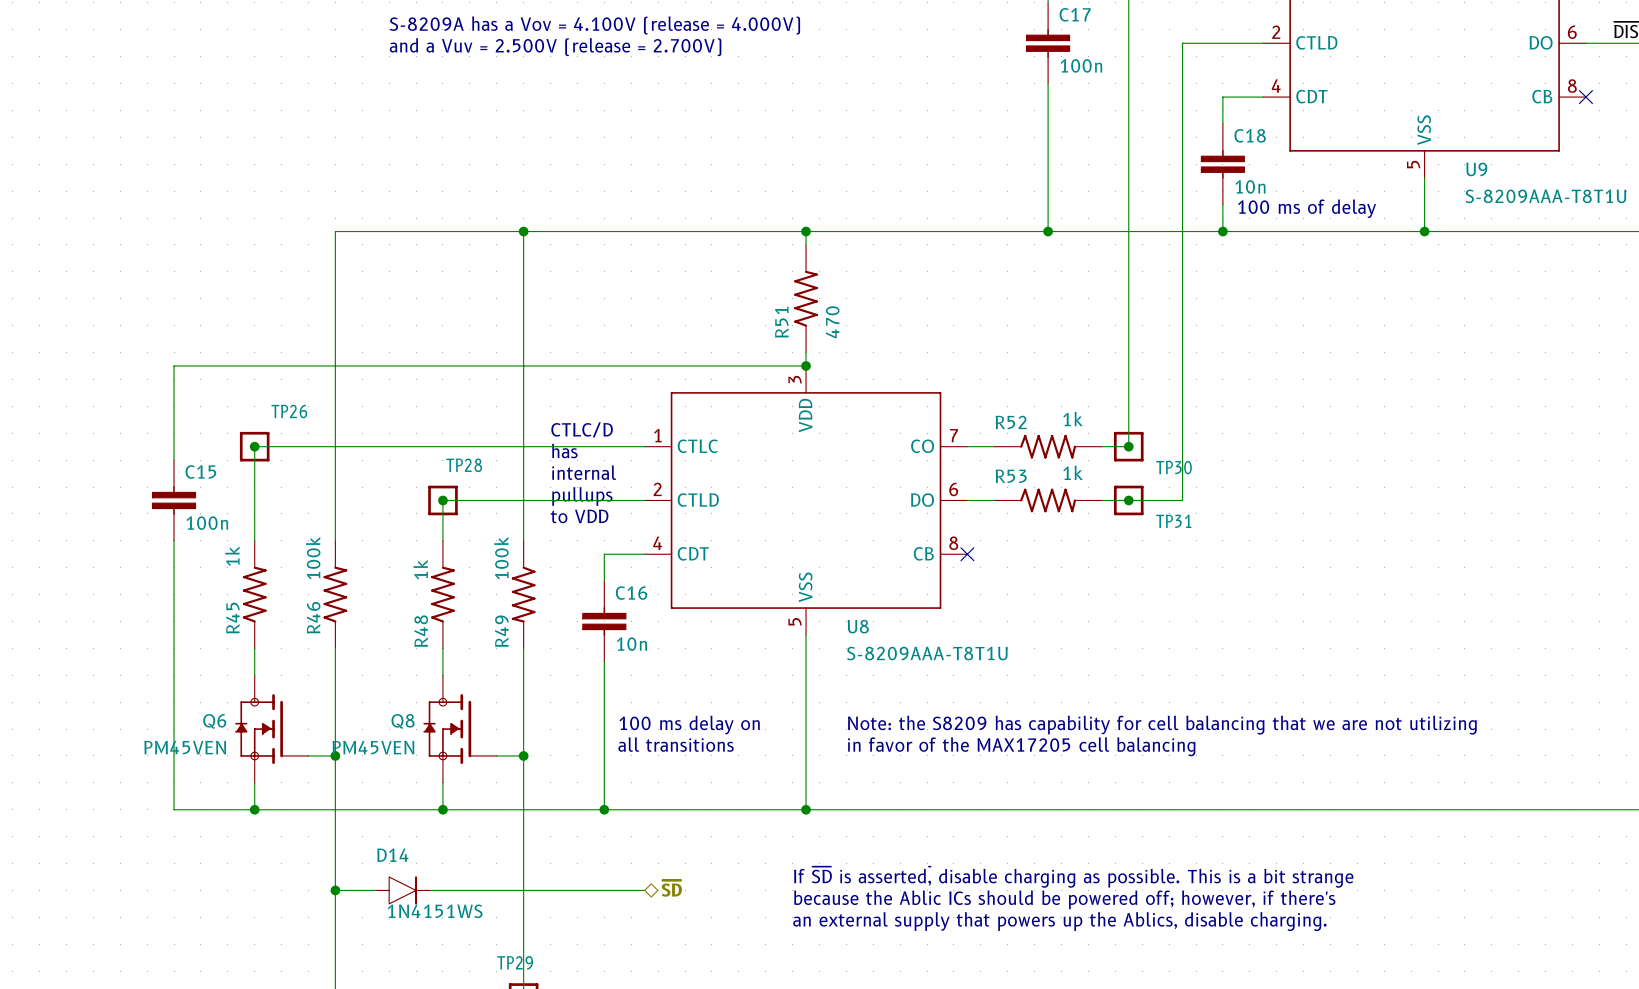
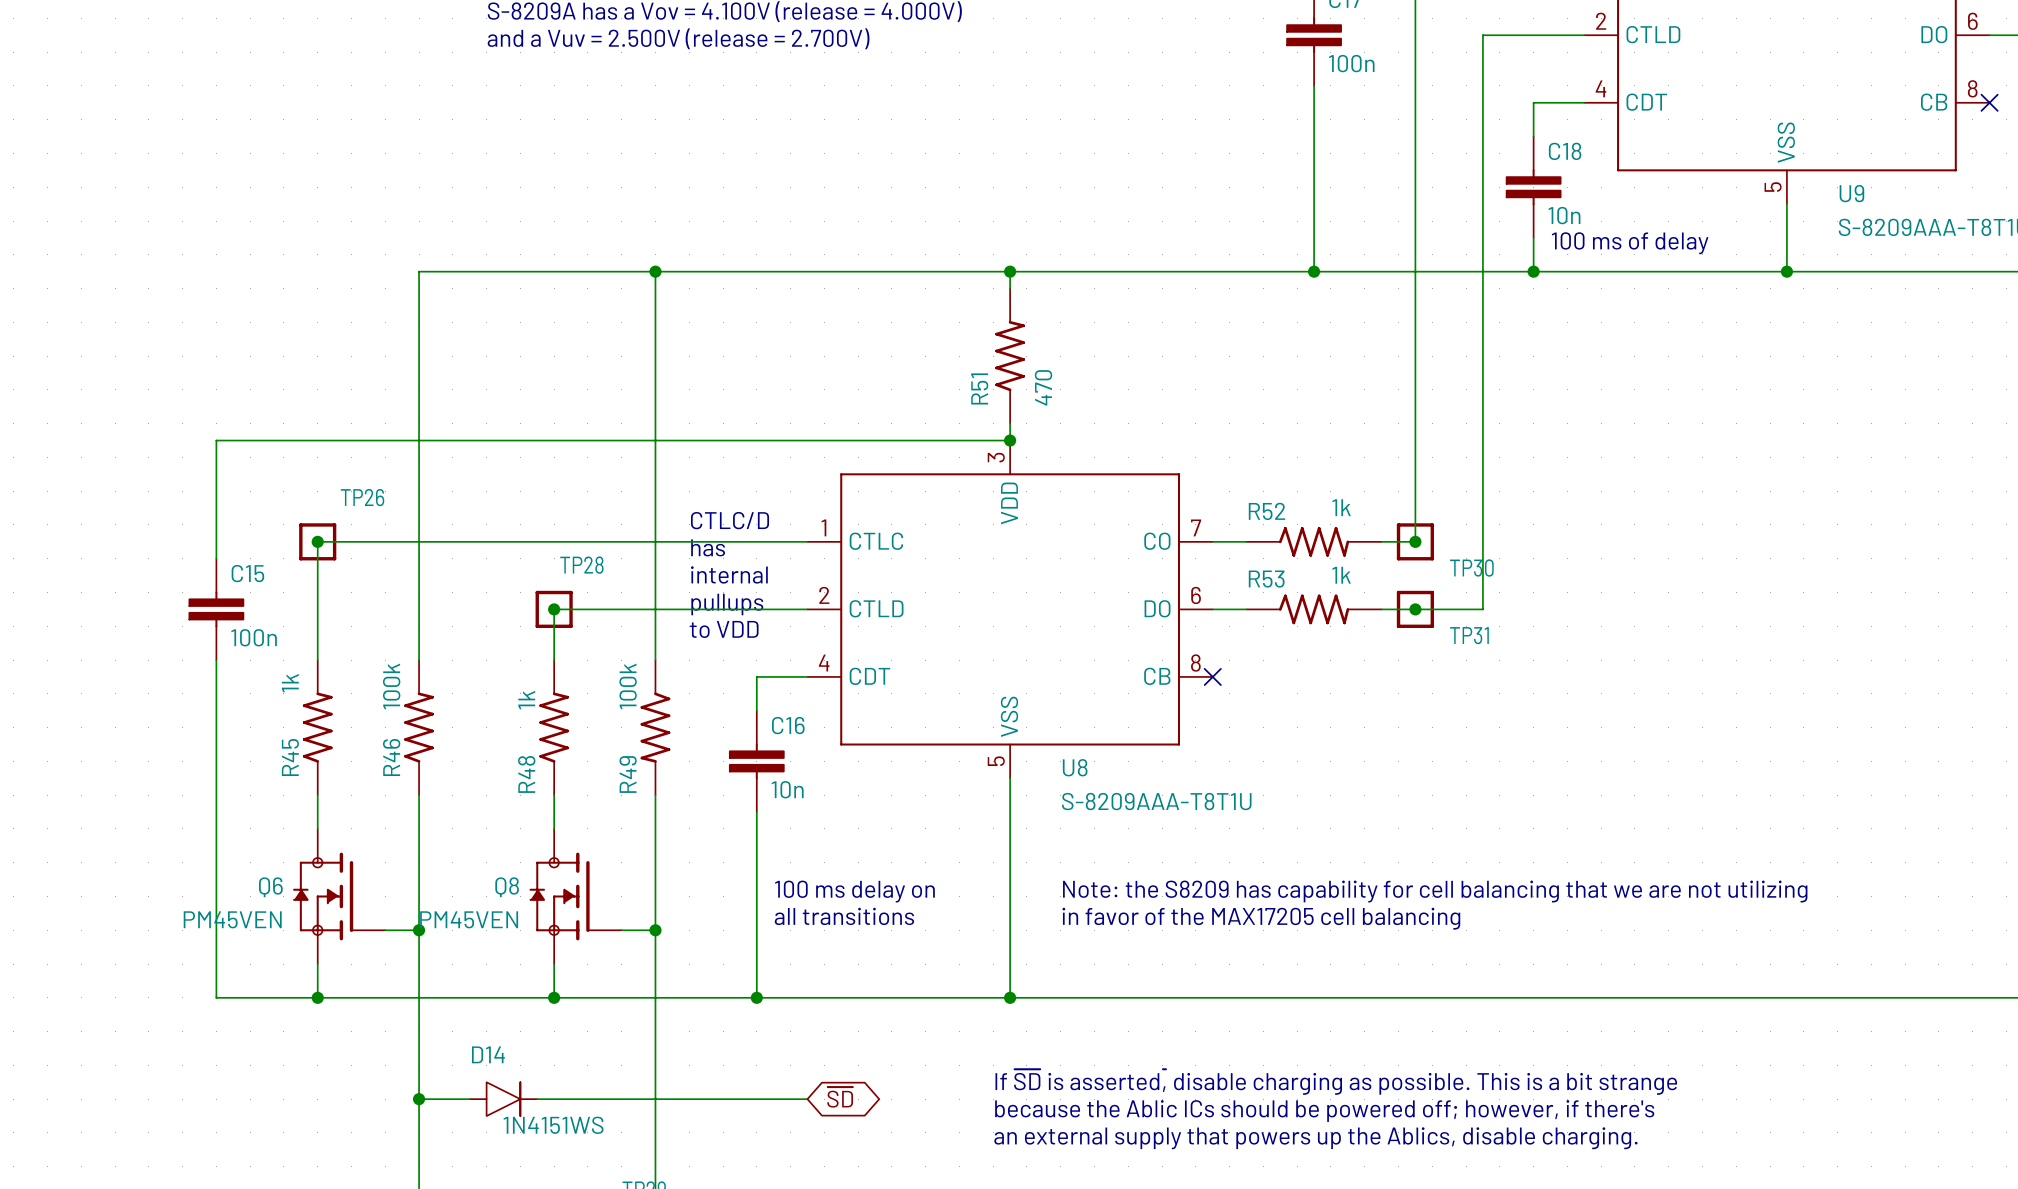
hierarchical label: ~{SD} (671, 888) -> none
global label: none -> ~{SD} (840, 1097)

